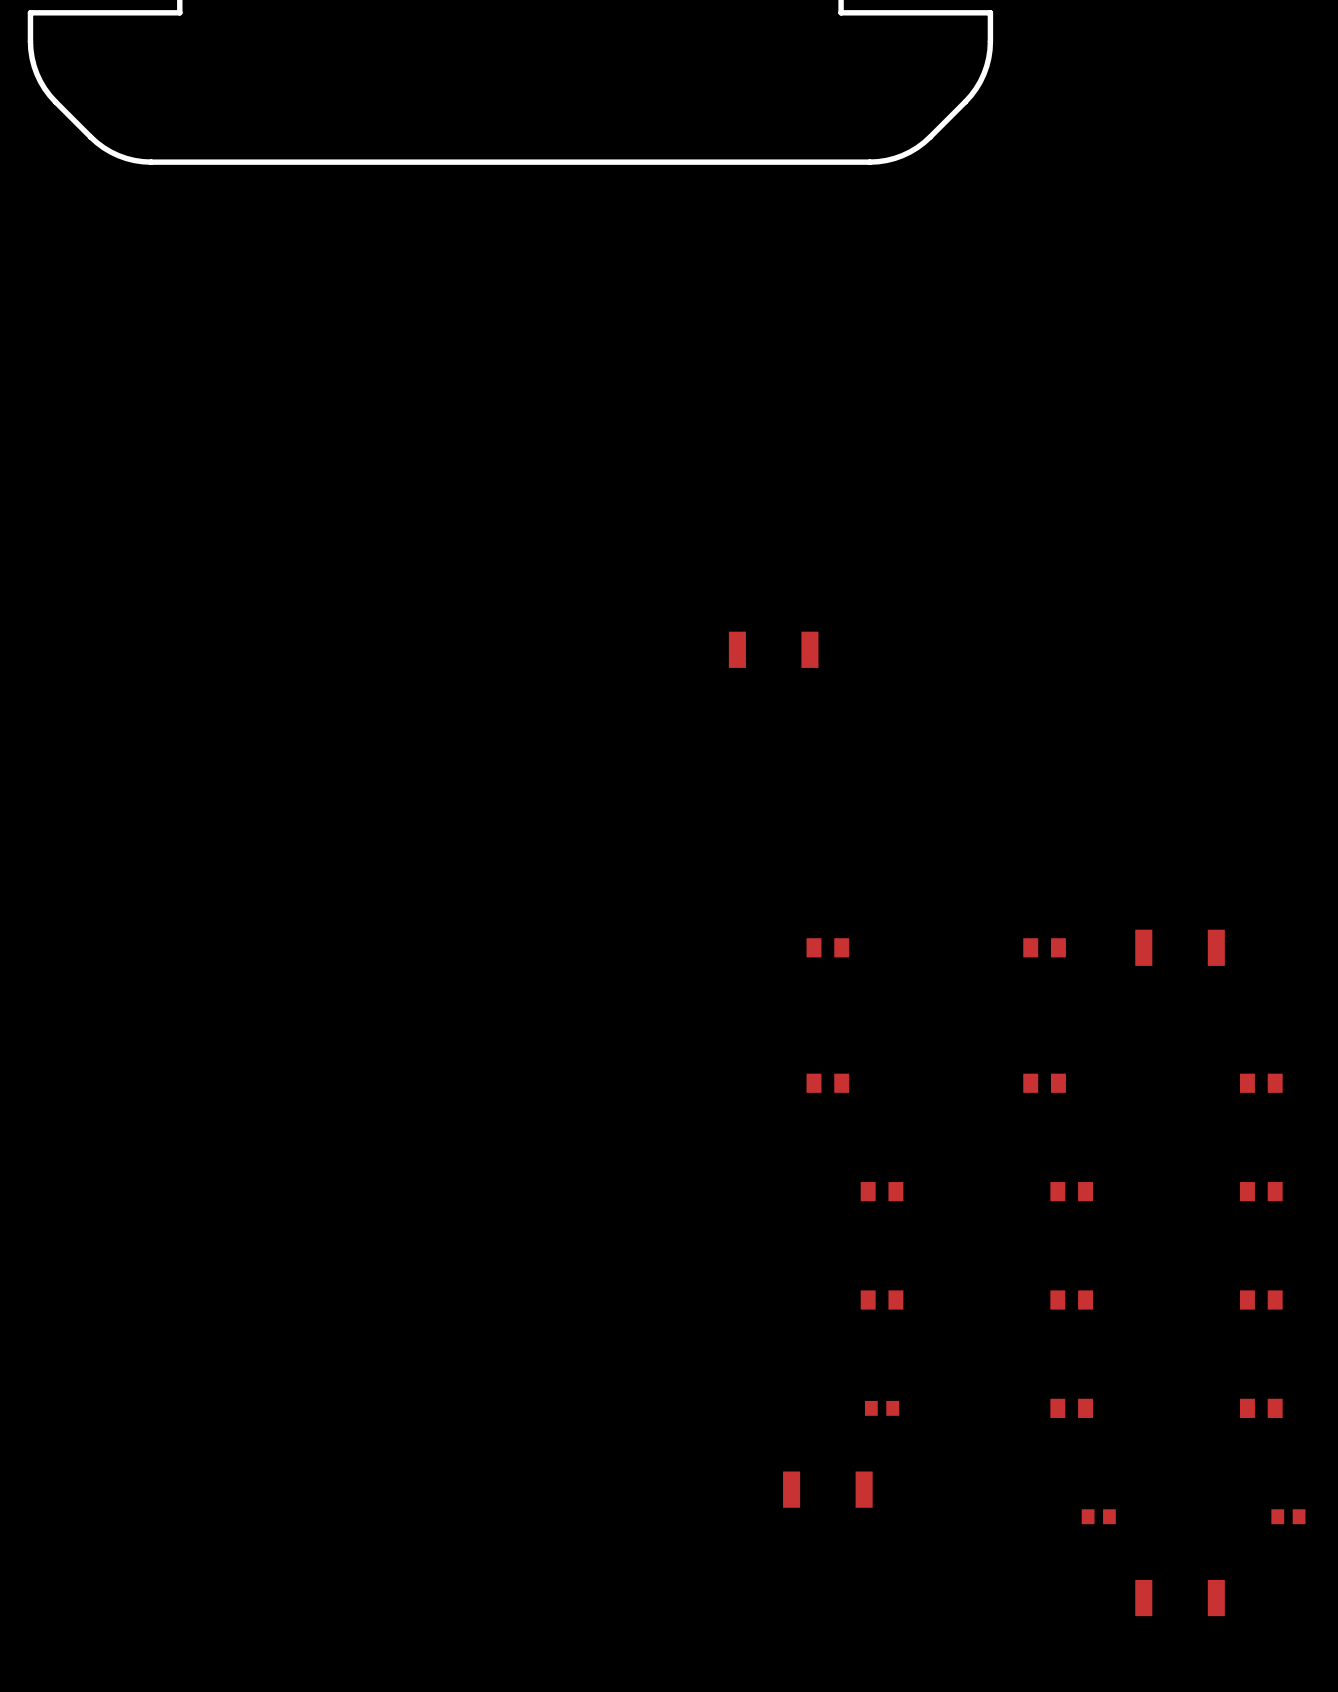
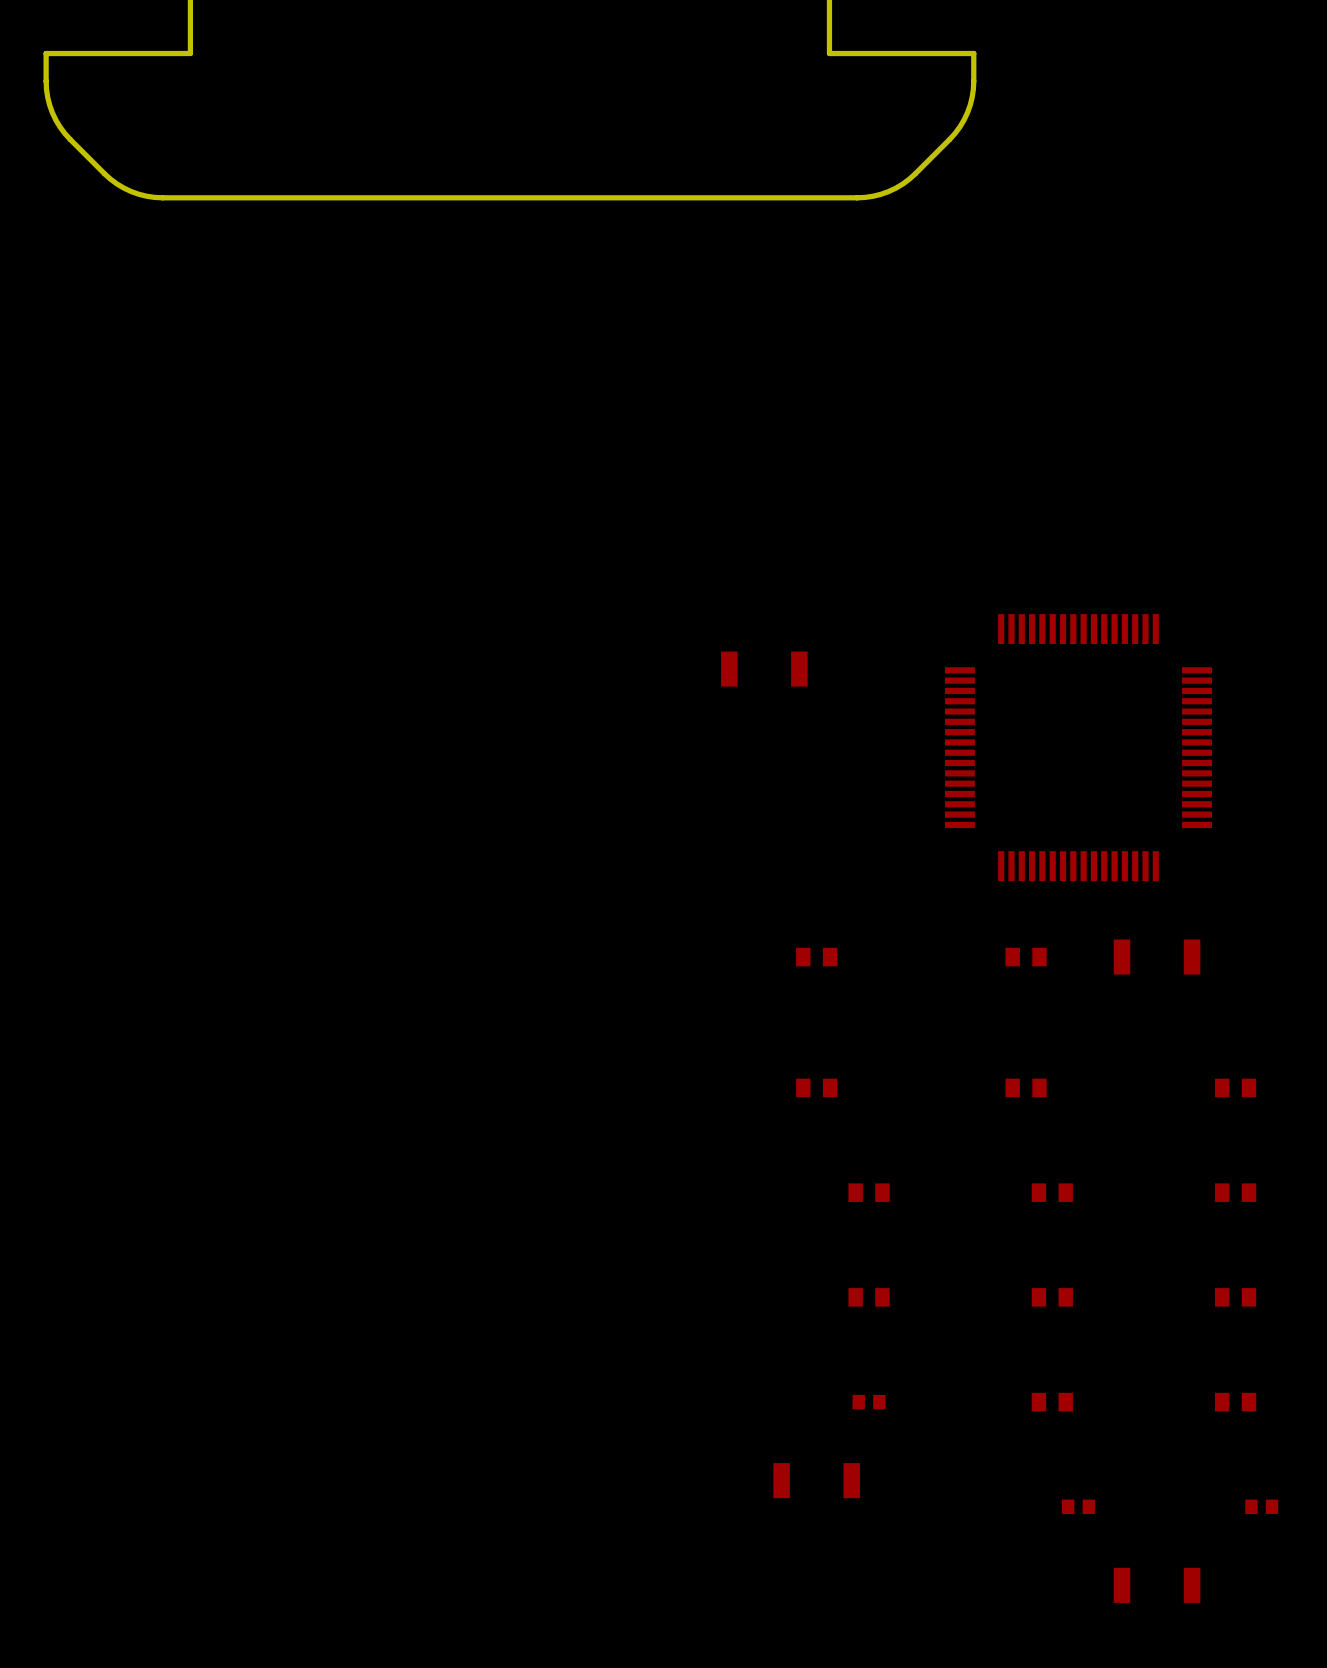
part: none -> (1078, 747)

